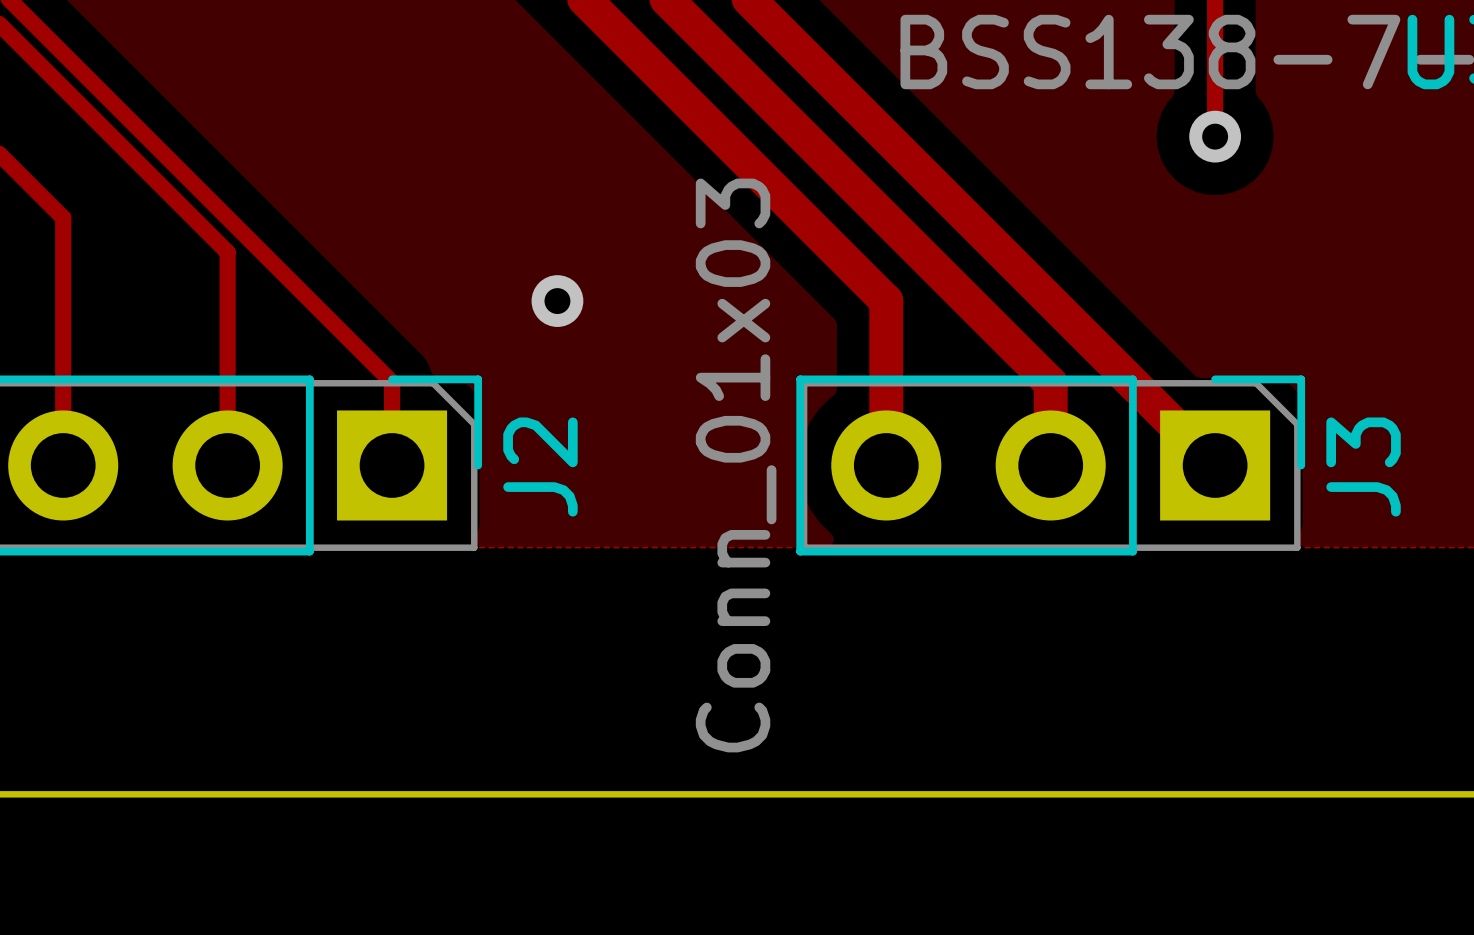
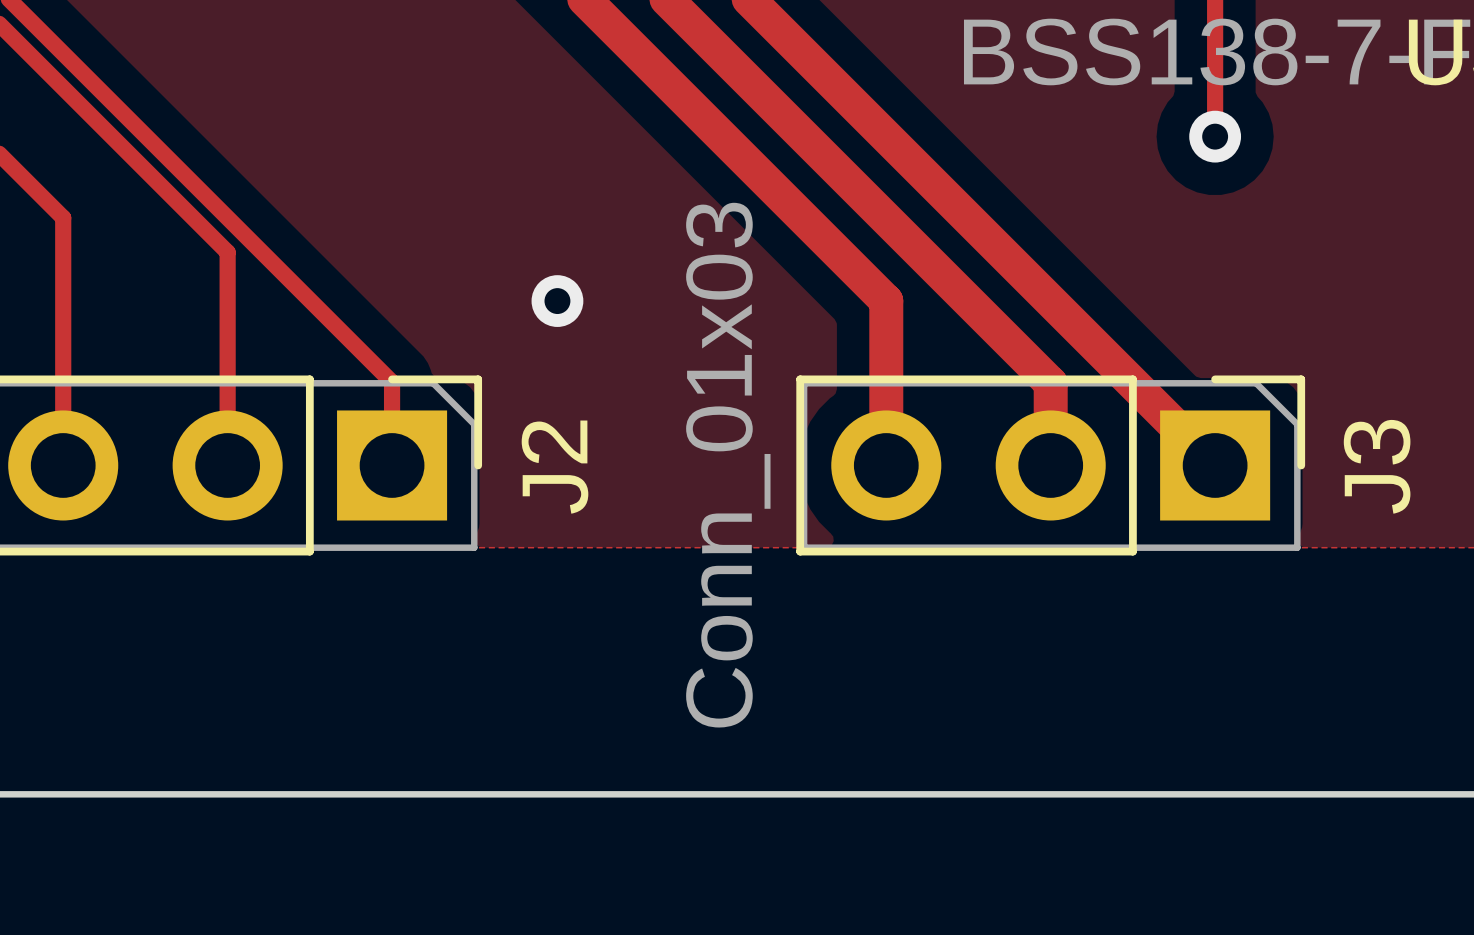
J3 value position: Conn_01x03 (736, 465) -> Conn_01x03 (728, 465)
J2 name position: J2 (540, 467) -> J2 (555, 467)
J3 name position: J3 (1363, 467) -> J3 (1377, 466)

